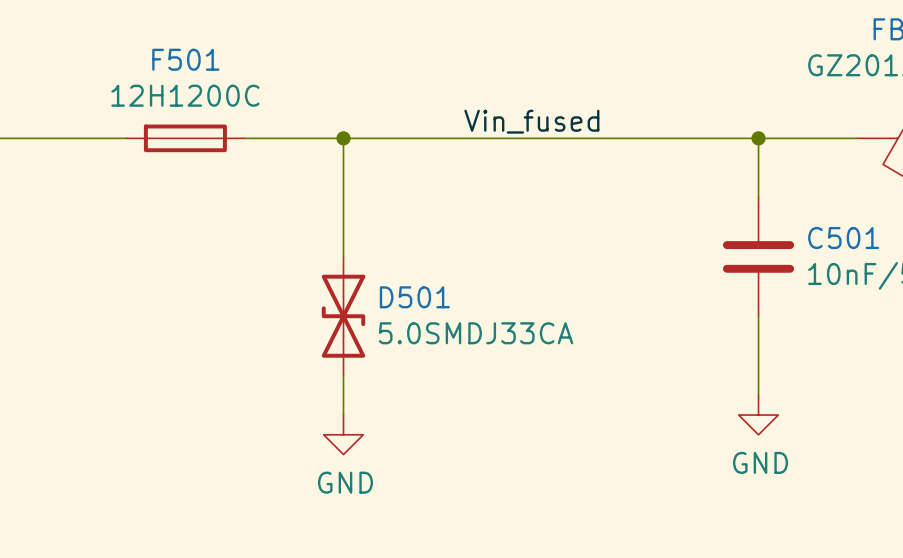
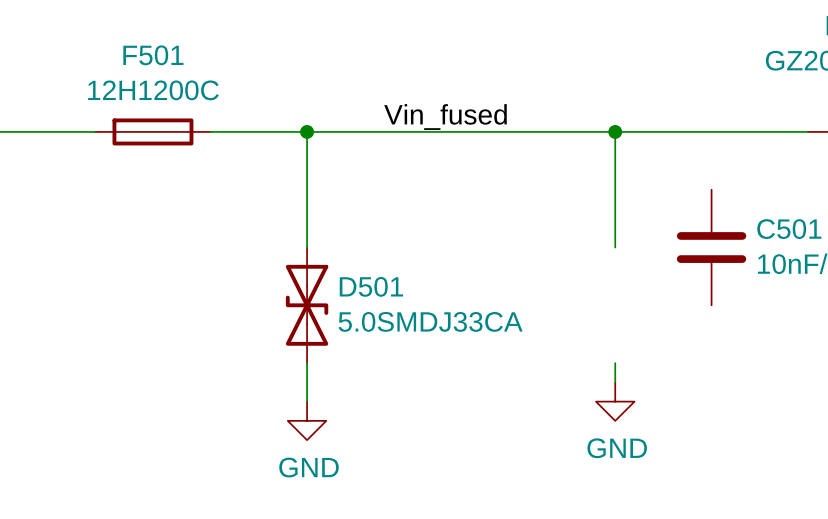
label position: Vin_fused (531, 121) -> Vin_fused (445, 117)
wire: none -> (615, 131) (615, 247)
junction: none -> (615, 131)
wire: (758, 138) (758, 197) -> none
junction: (758, 138) -> none
wire: (758, 316) (758, 395) -> none
wire: none -> (615, 363) (615, 382)
power symbol position: GND (758, 415) -> GND (615, 401)

